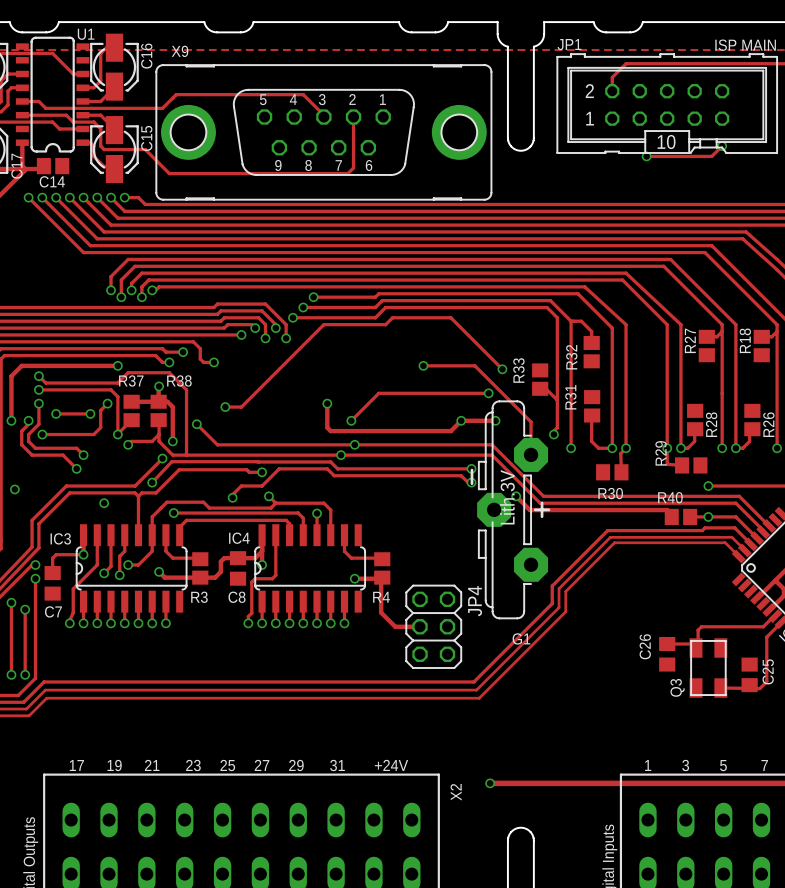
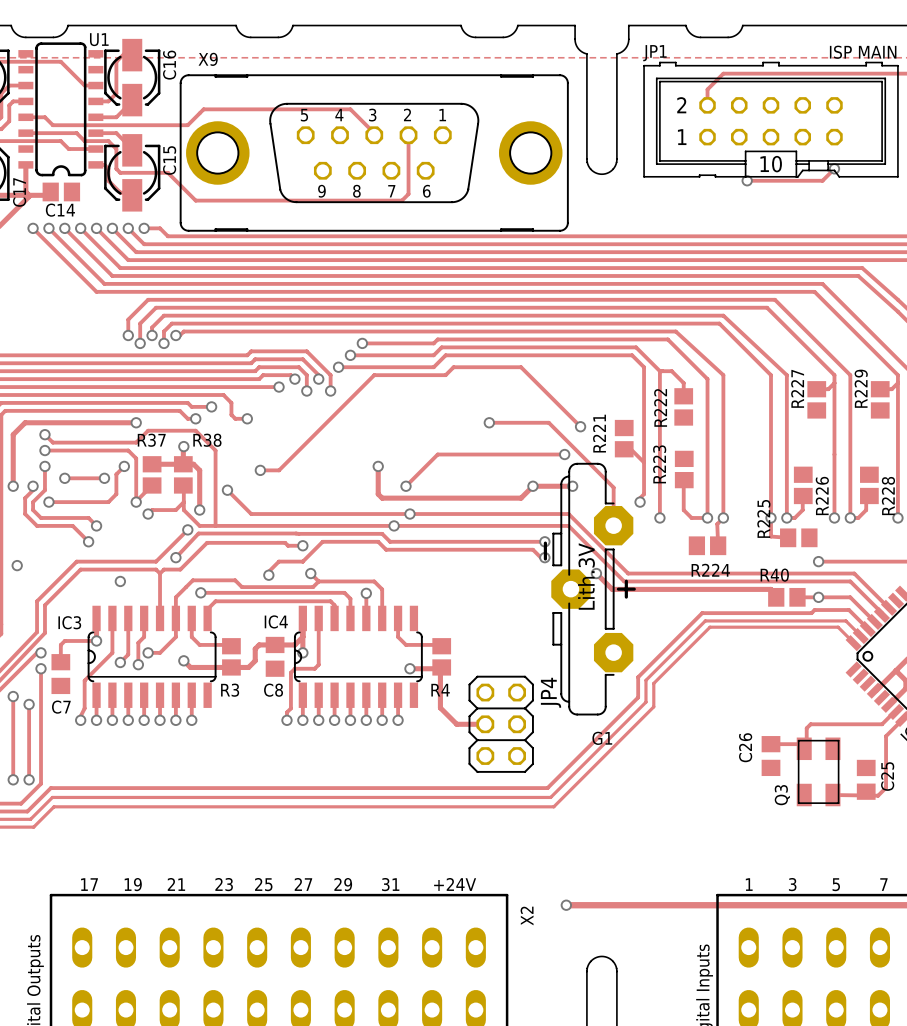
R27 name: R27 (690, 340) -> R227 (797, 388)
R18 name: R18 (745, 340) -> R229 (861, 388)
R32 name: R32 (571, 357) -> R222 (660, 407)
R33 name: R33 (518, 370) -> R221 (599, 433)
R31 name: R31 (570, 397) -> R223 (659, 464)
R28 name: R28 (711, 424) -> R226 (822, 495)
R26 name: R26 (768, 424) -> R228 (888, 496)
R29 name: R29 (661, 453) -> R225 (763, 518)
R30 name: R30 (610, 493) -> R224 (710, 570)

